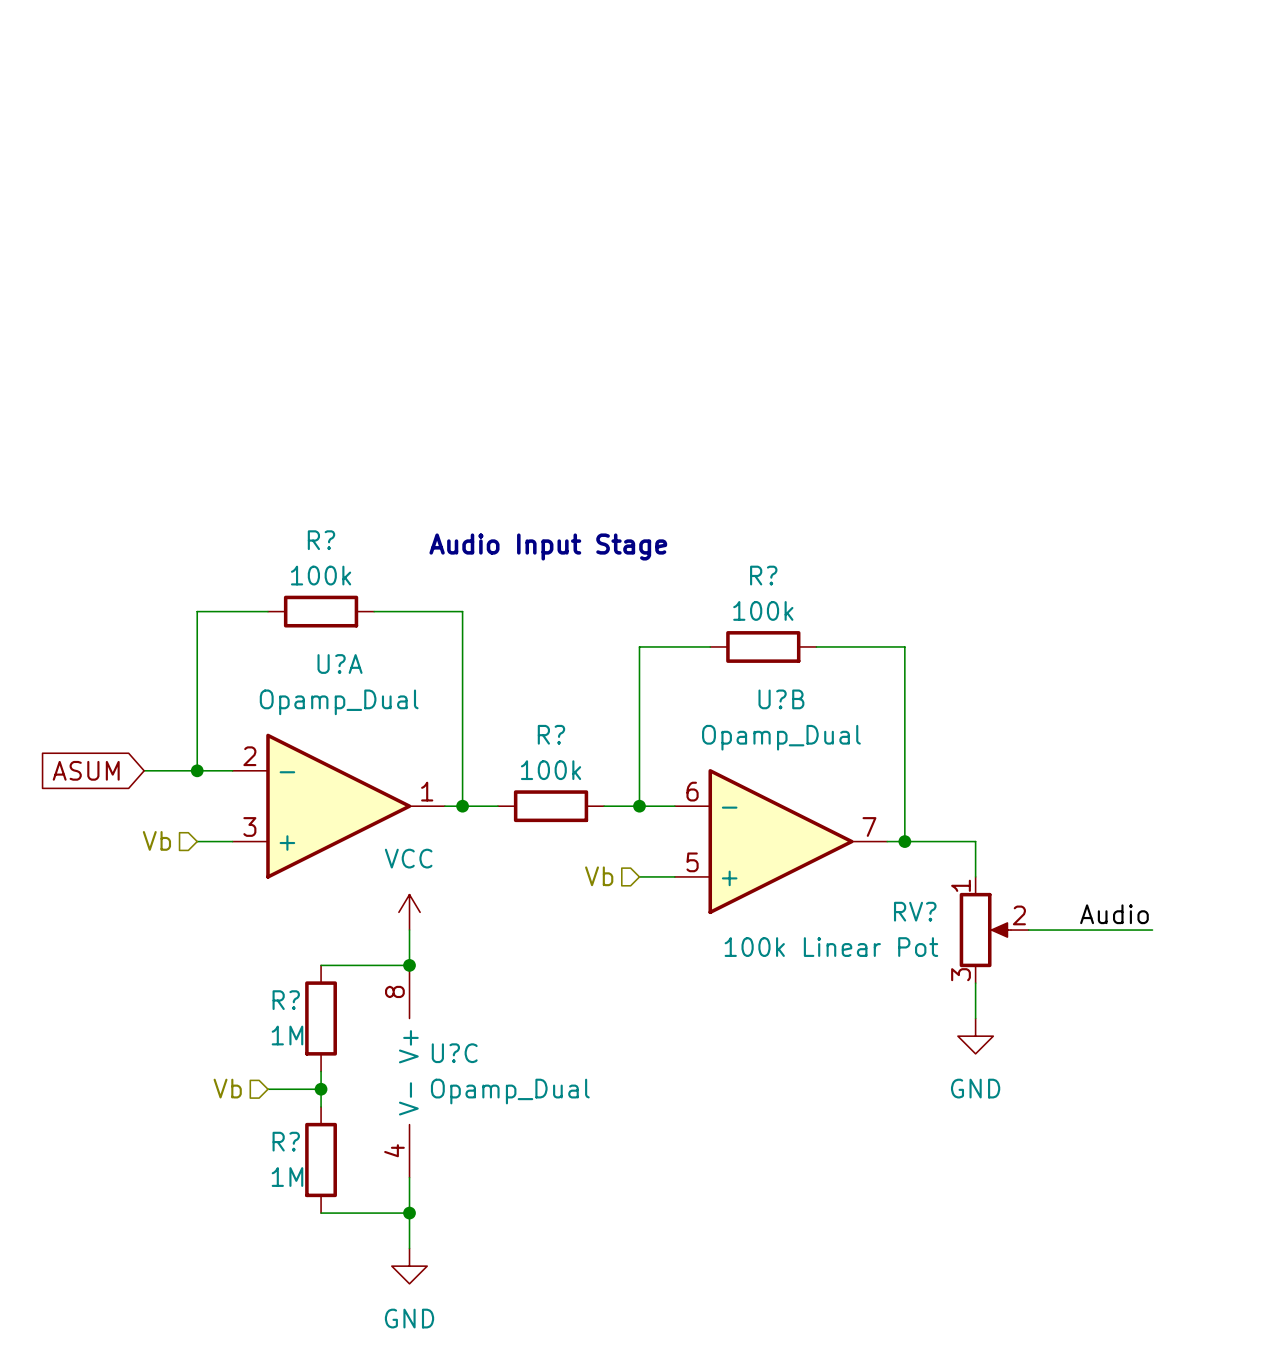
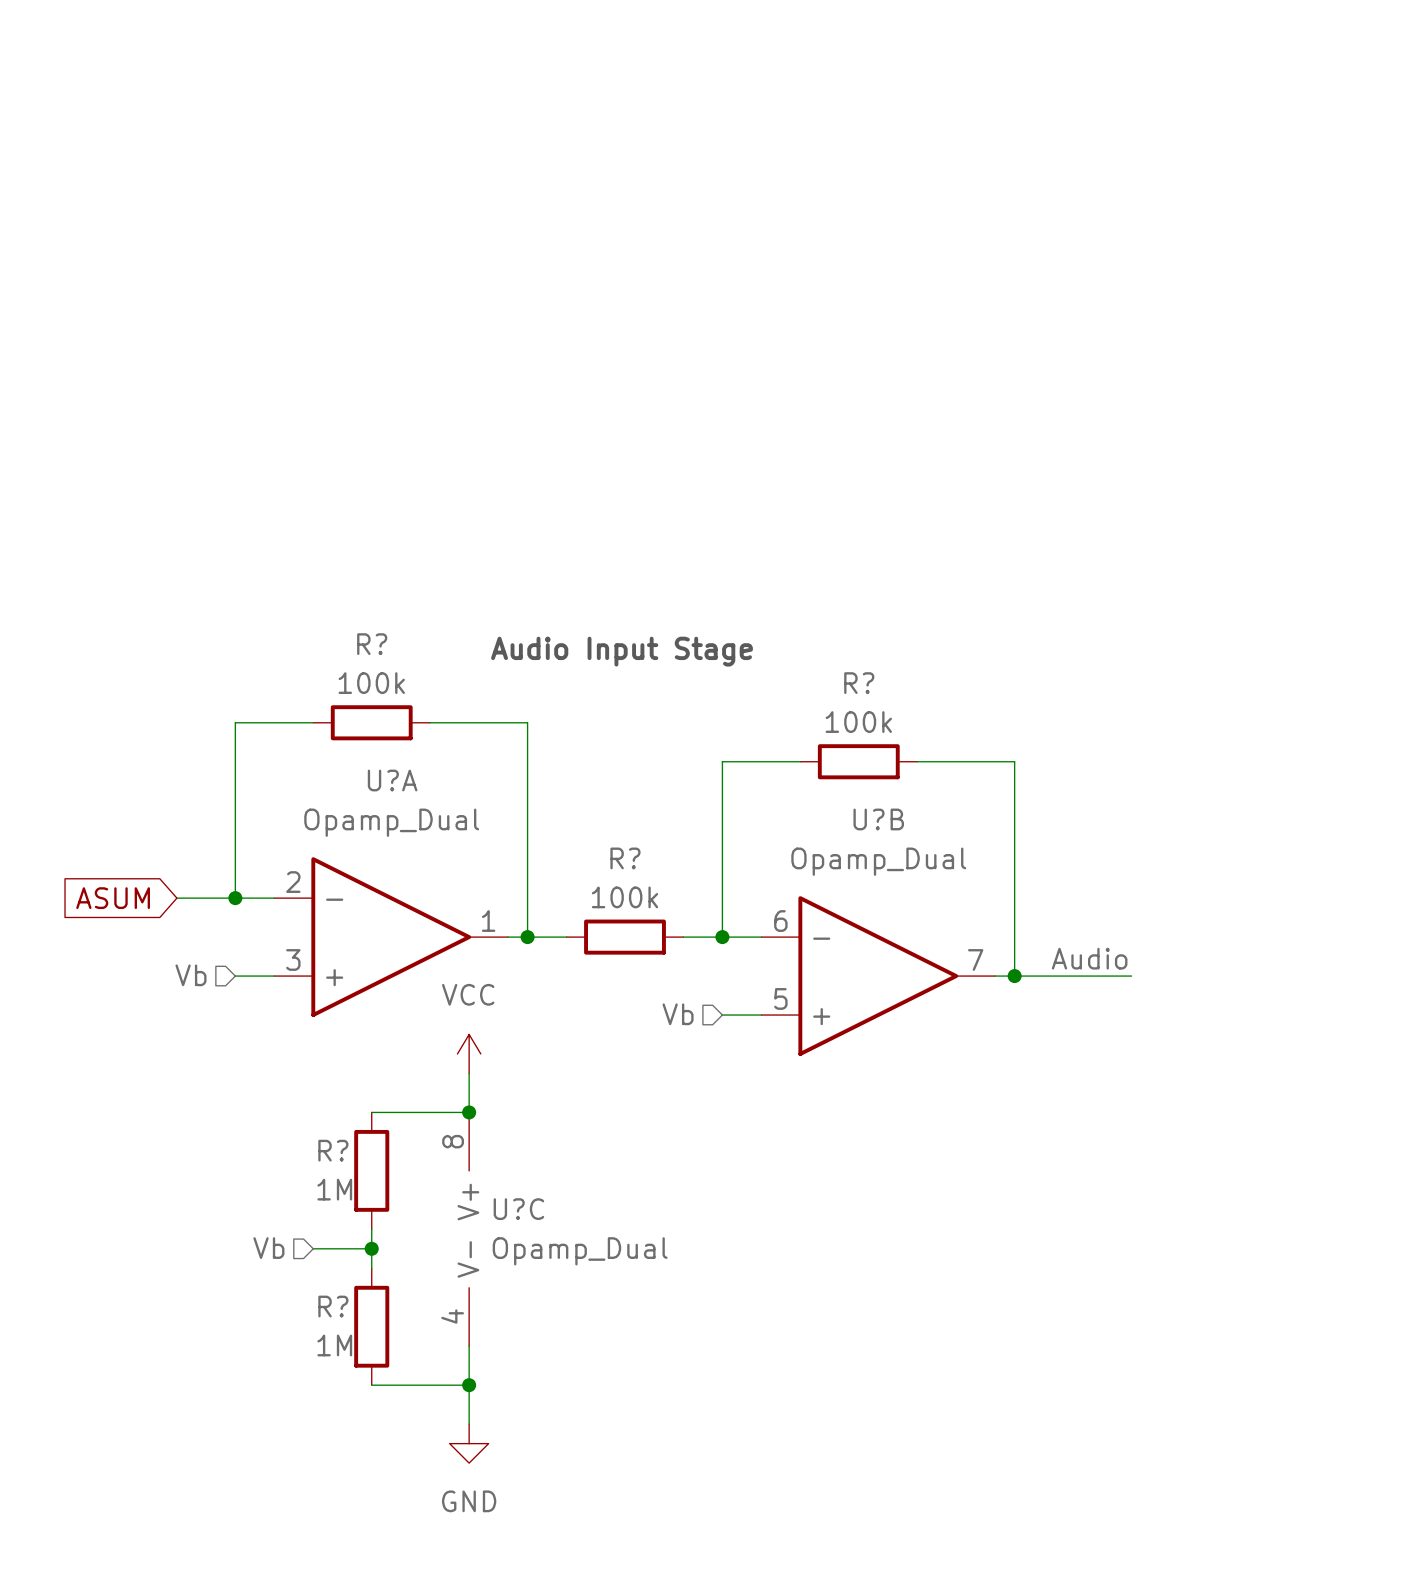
wire: (975, 841) (975, 876) -> (1092, 976) (1131, 976)
label position: Audio (1114, 914) -> Audio (1089, 958)
RV?: 100k Linear Pot (994, 930) -> none
wire: (1028, 930) (1152, 930) -> none
wire: (975, 983) (975, 1018) -> none
power symbol: GND (975, 1036) -> none

